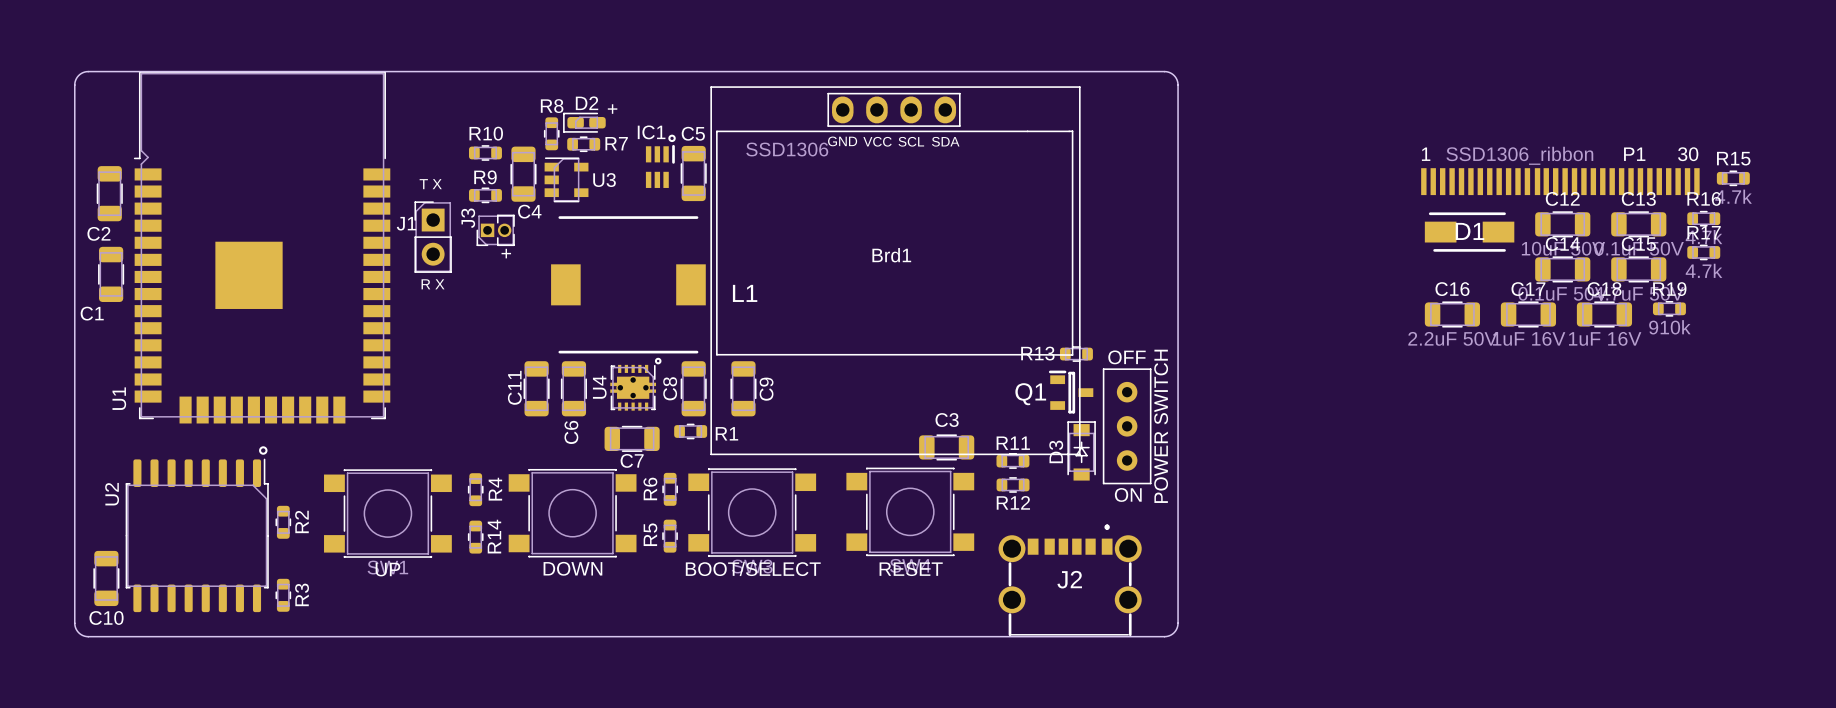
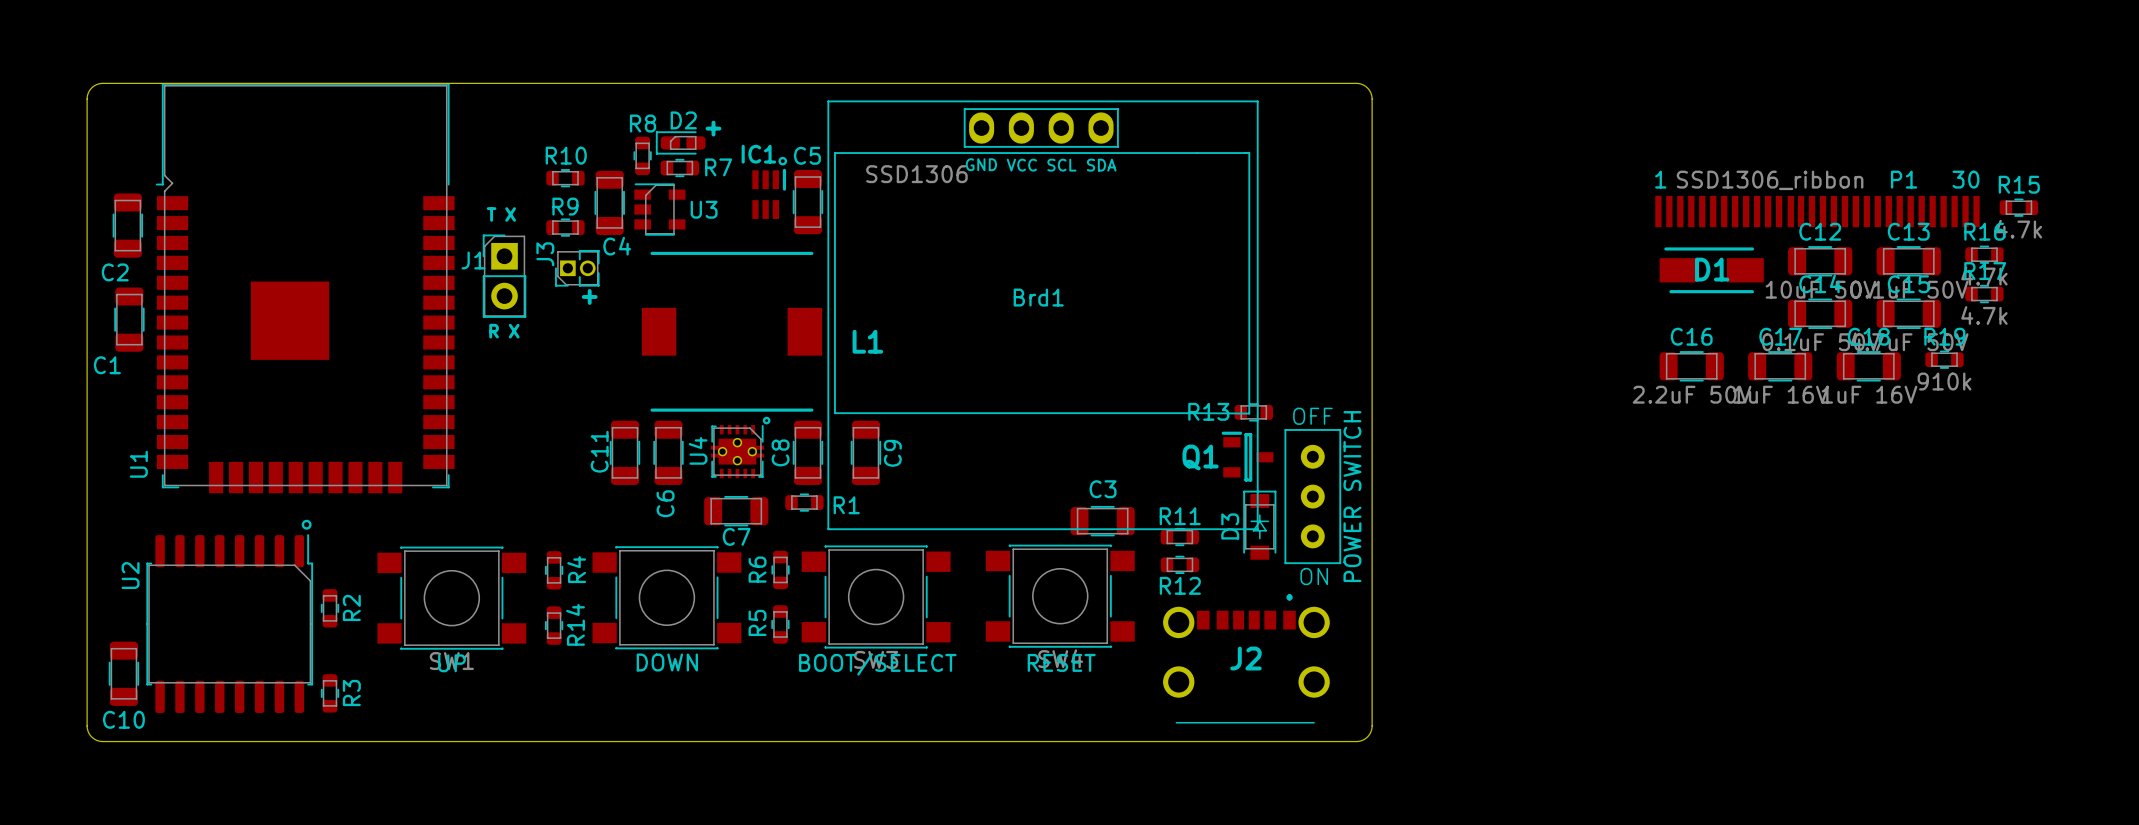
J2 footprint: [998, 524, 1142, 637] -> [1163, 594, 1330, 724]

